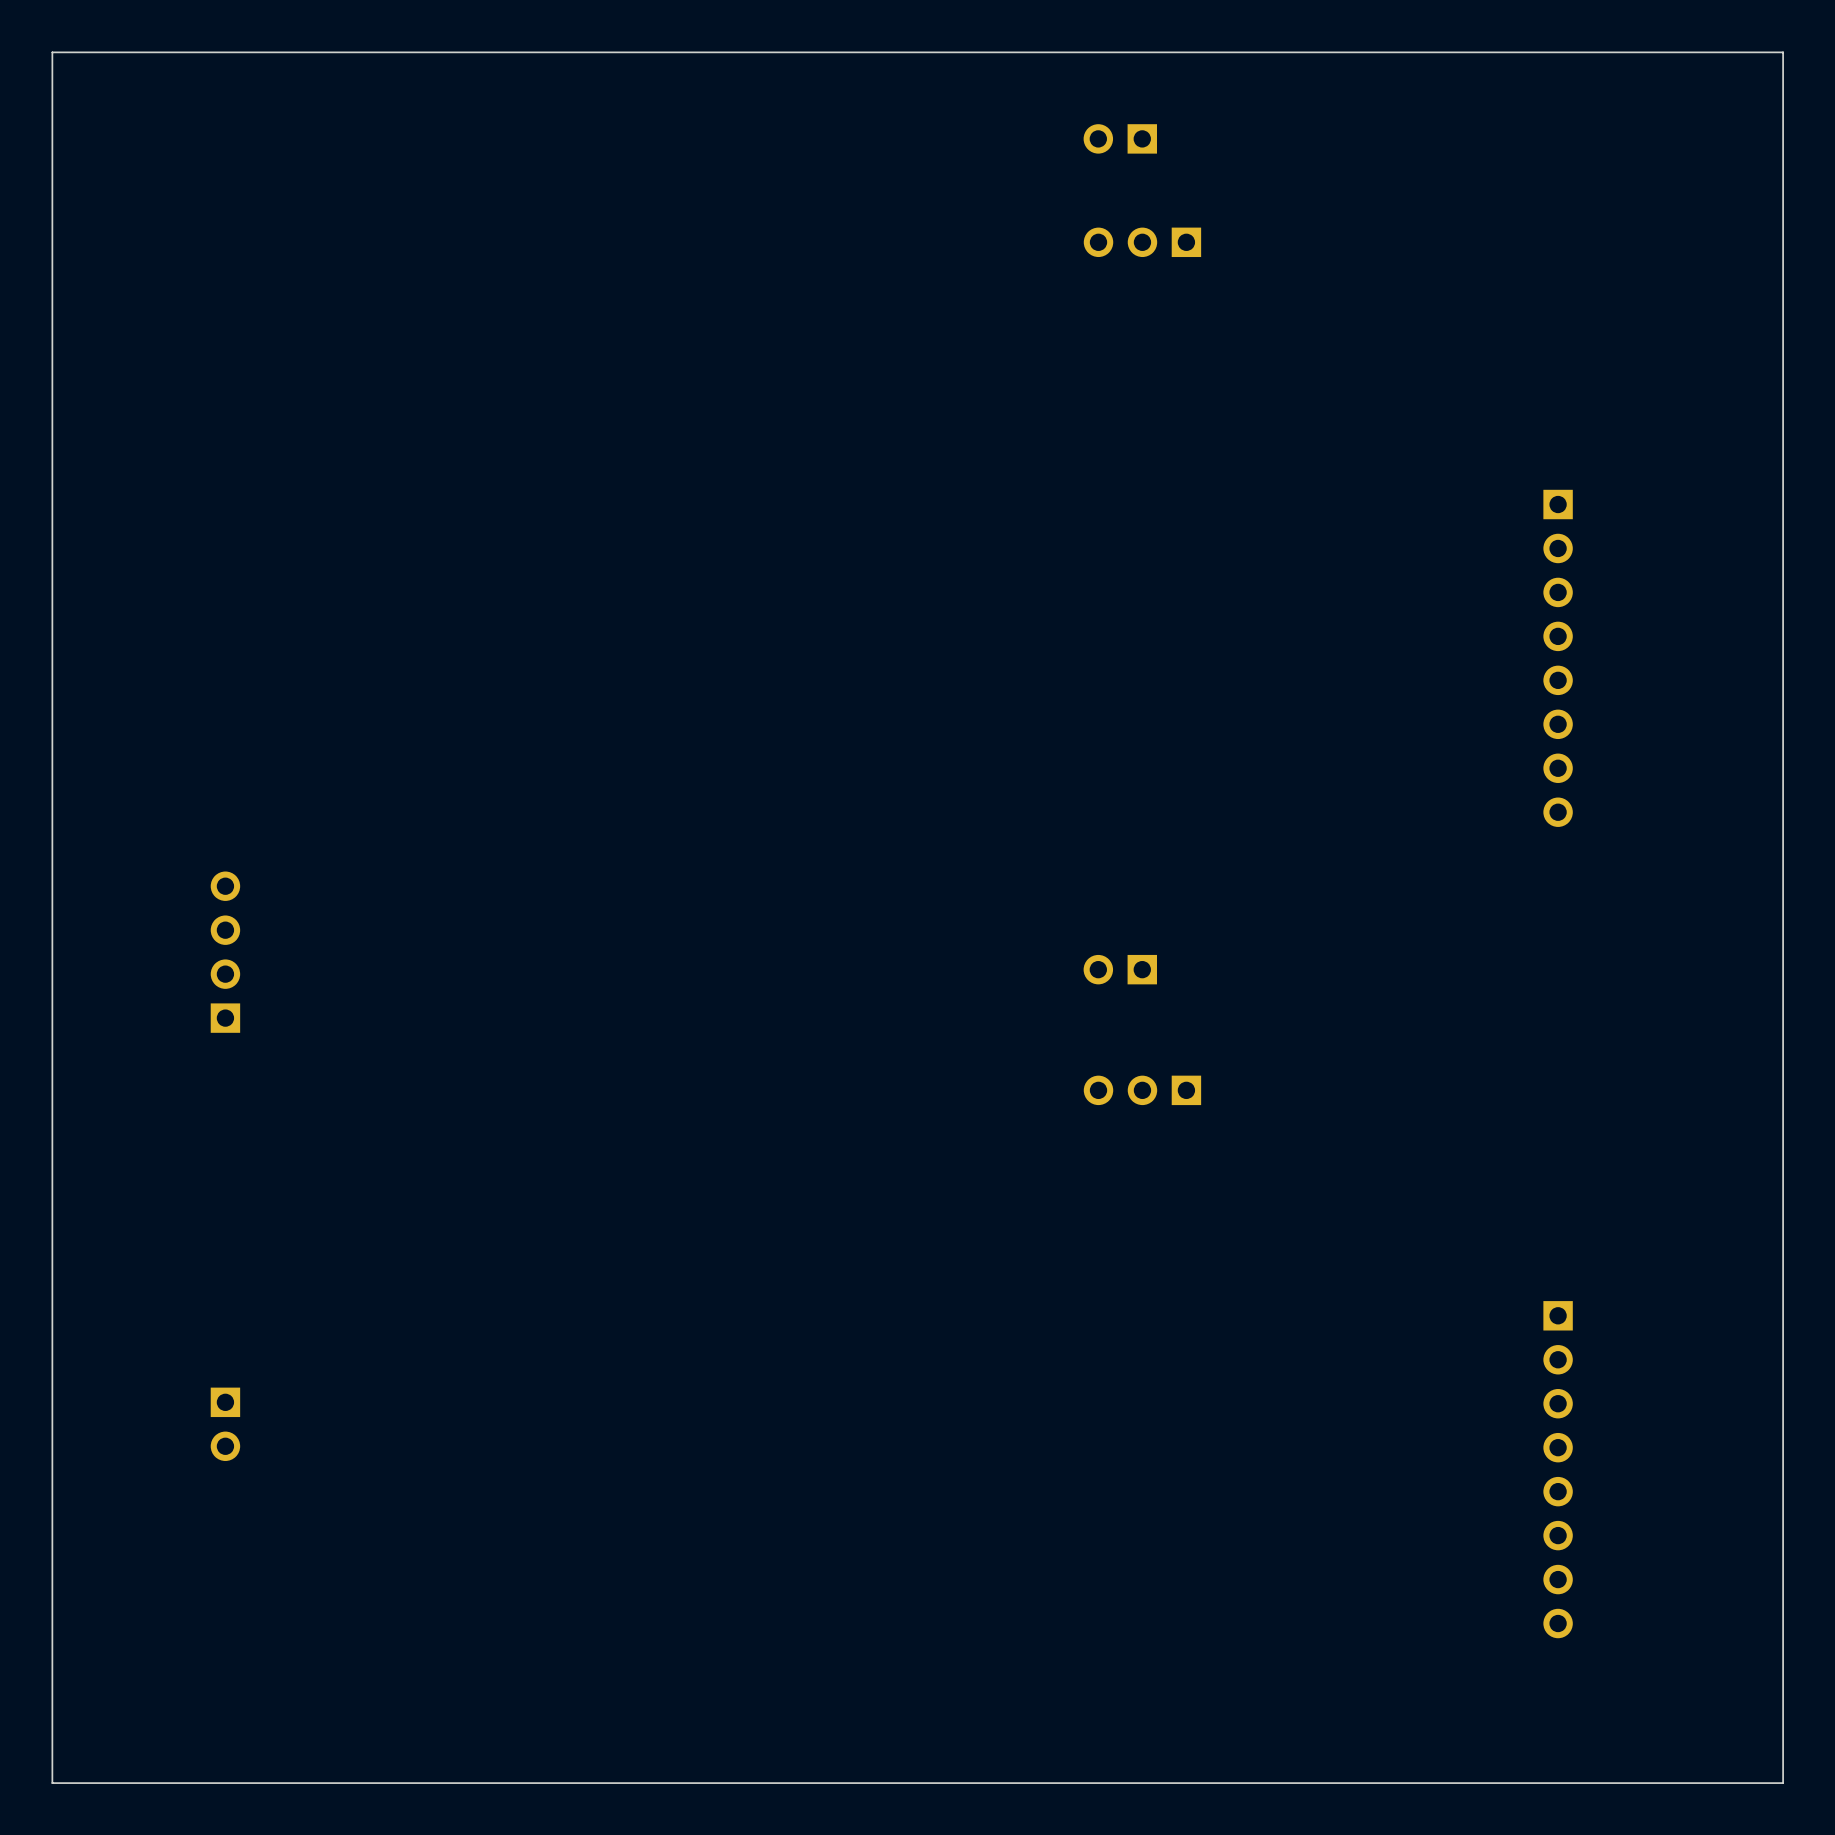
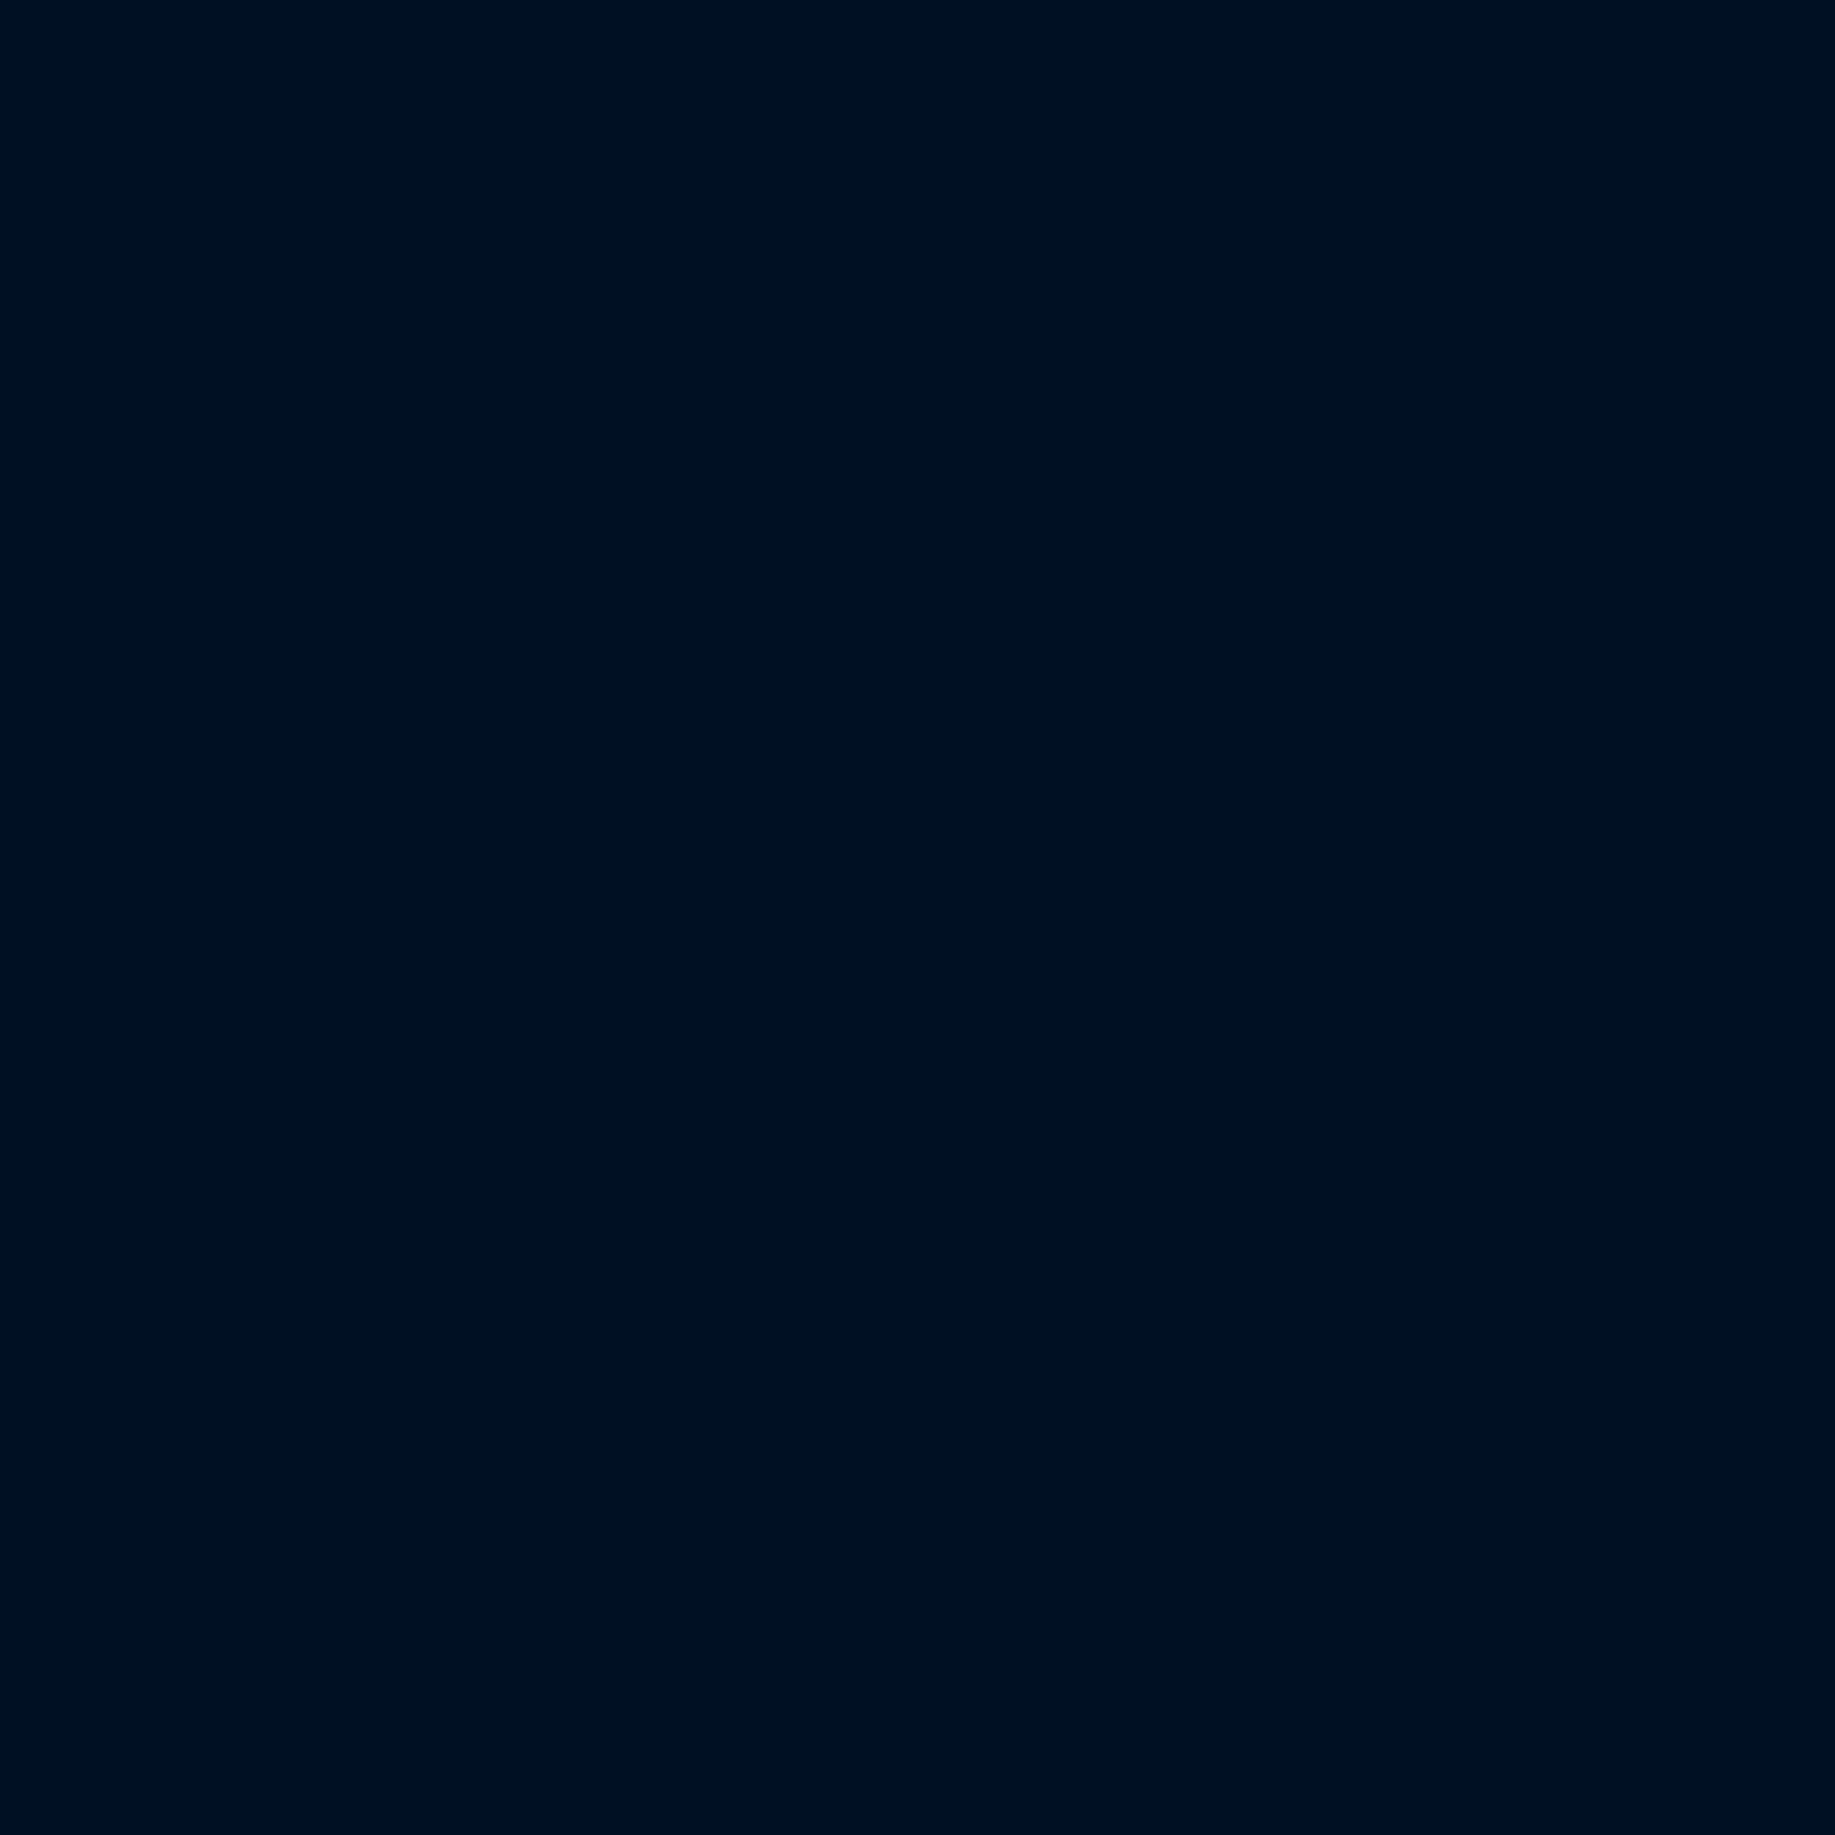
board edge: (1783, 52) (1783, 1783) (52, 1783) (52, 52) (1783, 52) -> none
part: (1120, 138) -> none
part: (1142, 242) -> none
part: (1558, 658) -> none
part: (225, 952) -> none
part: (1120, 969) -> none
part: (1142, 1090) -> none
part: (225, 1424) -> none
part: (1558, 1469) -> none

